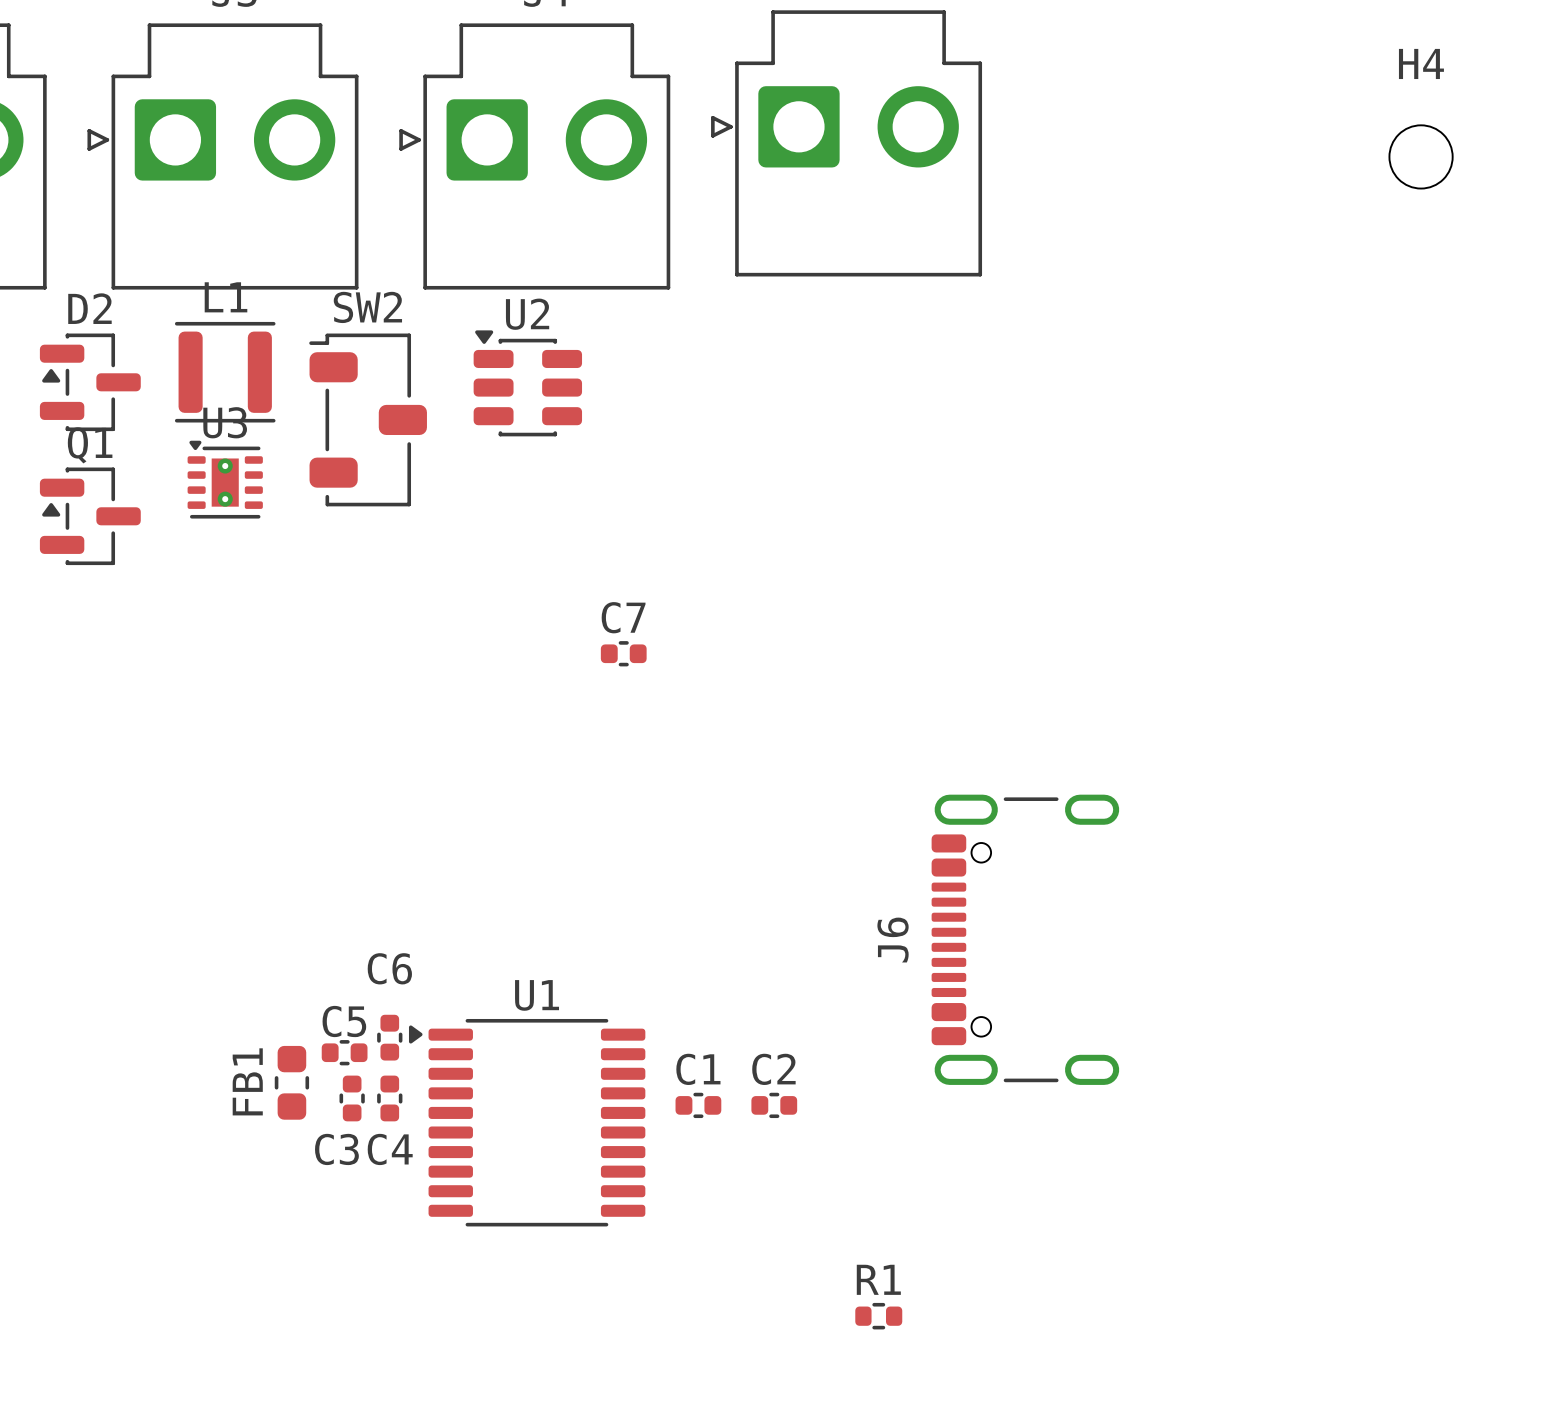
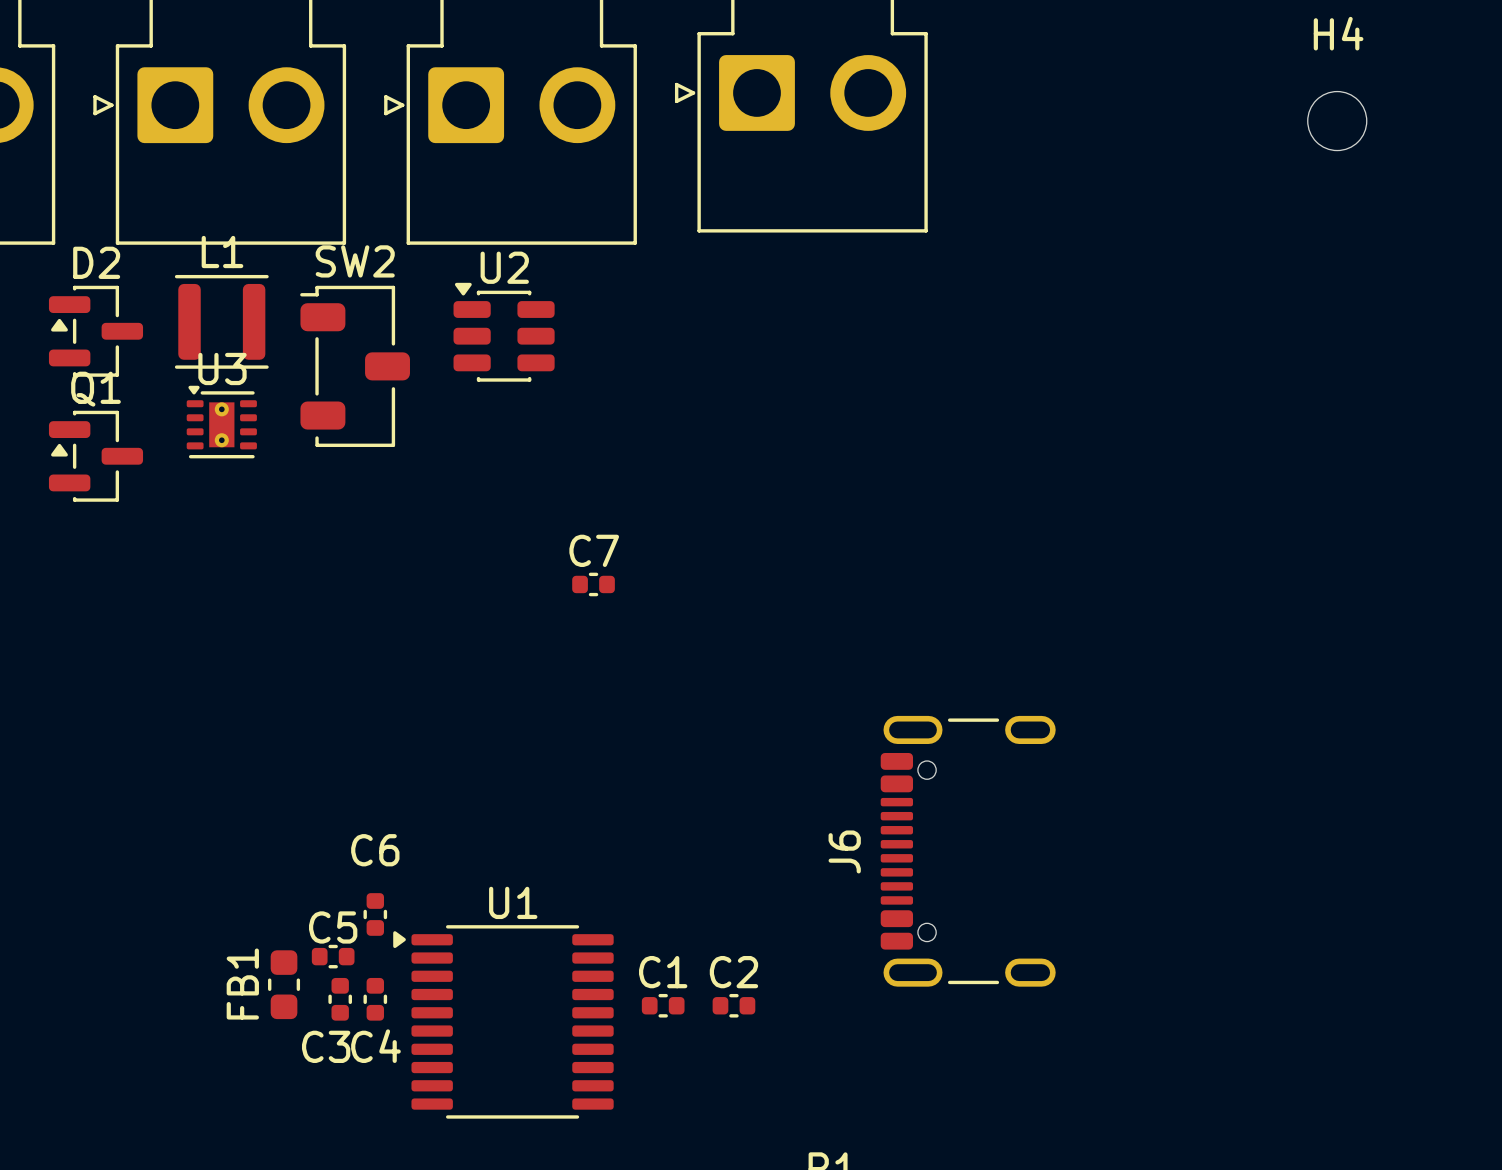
C6 position: (389, 1037) -> (375, 914)

